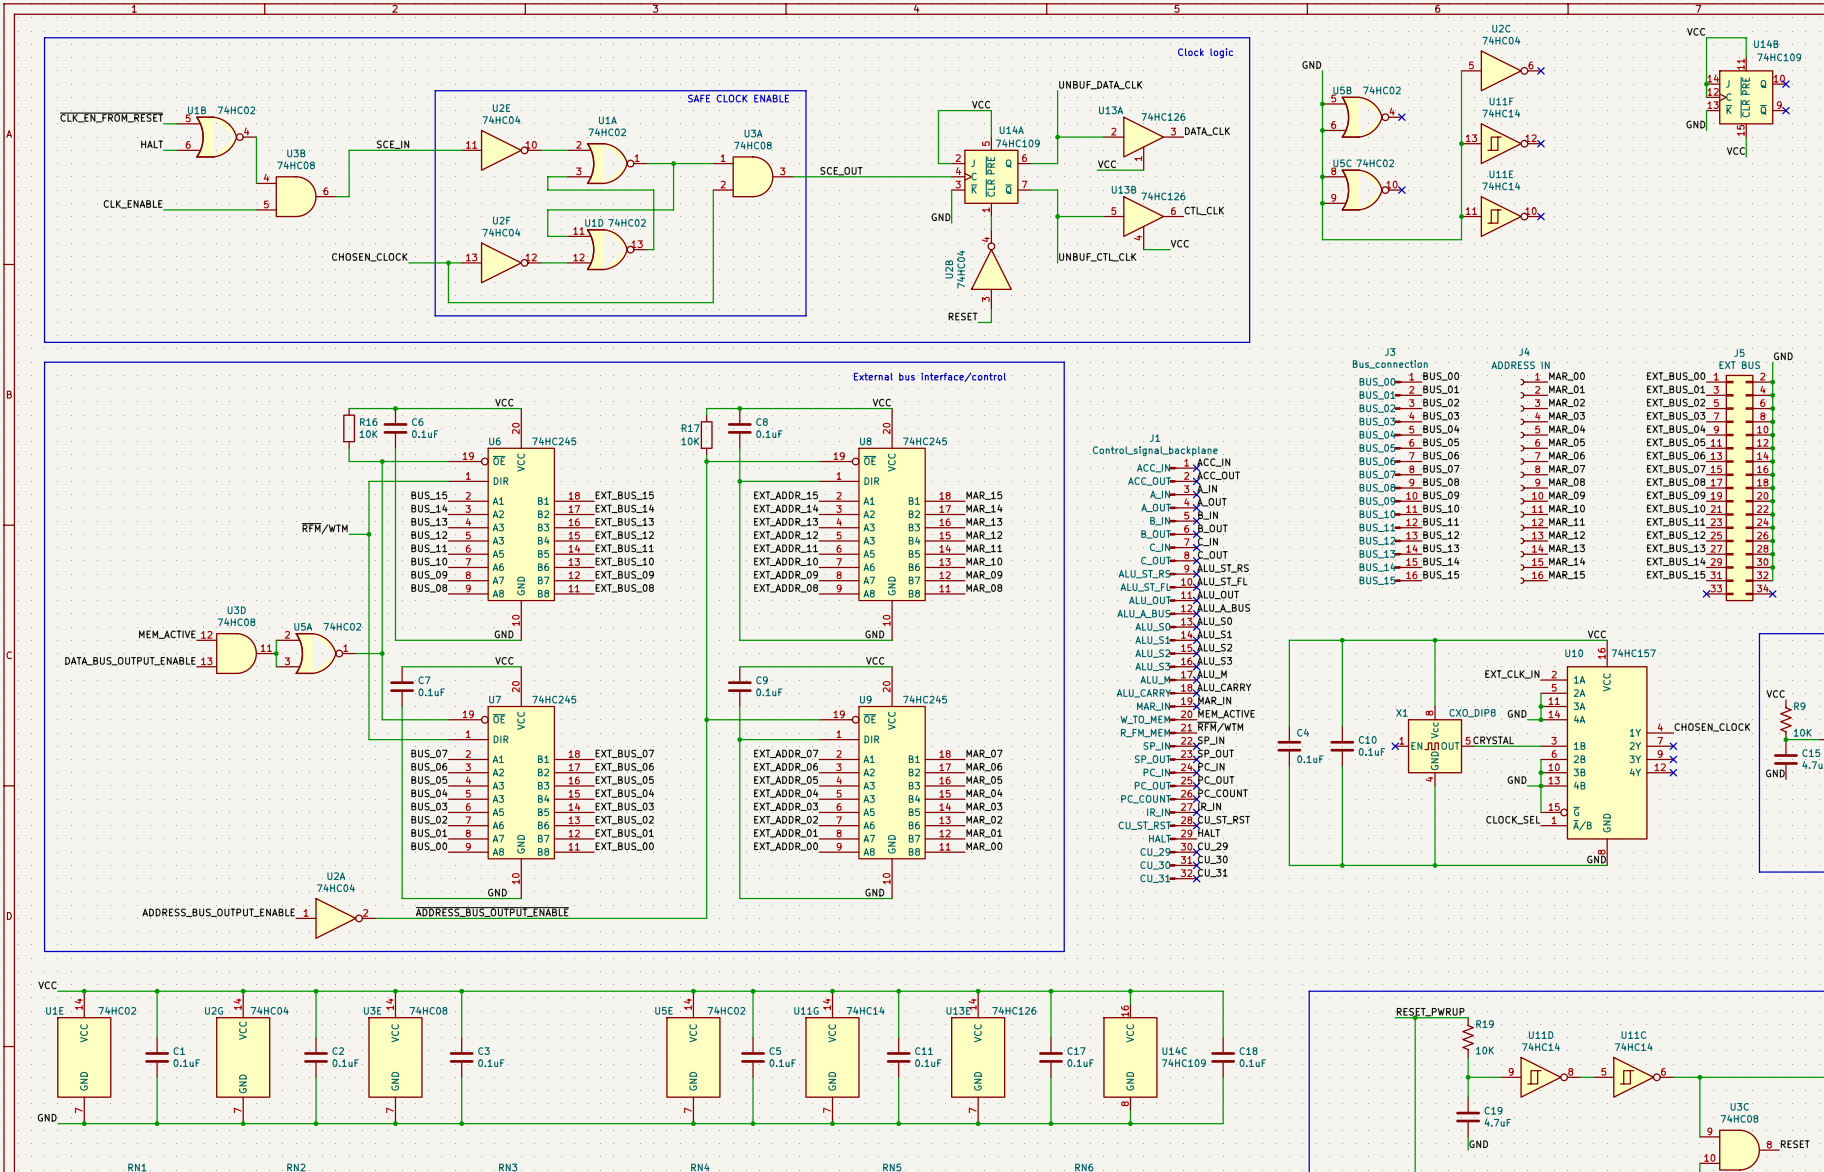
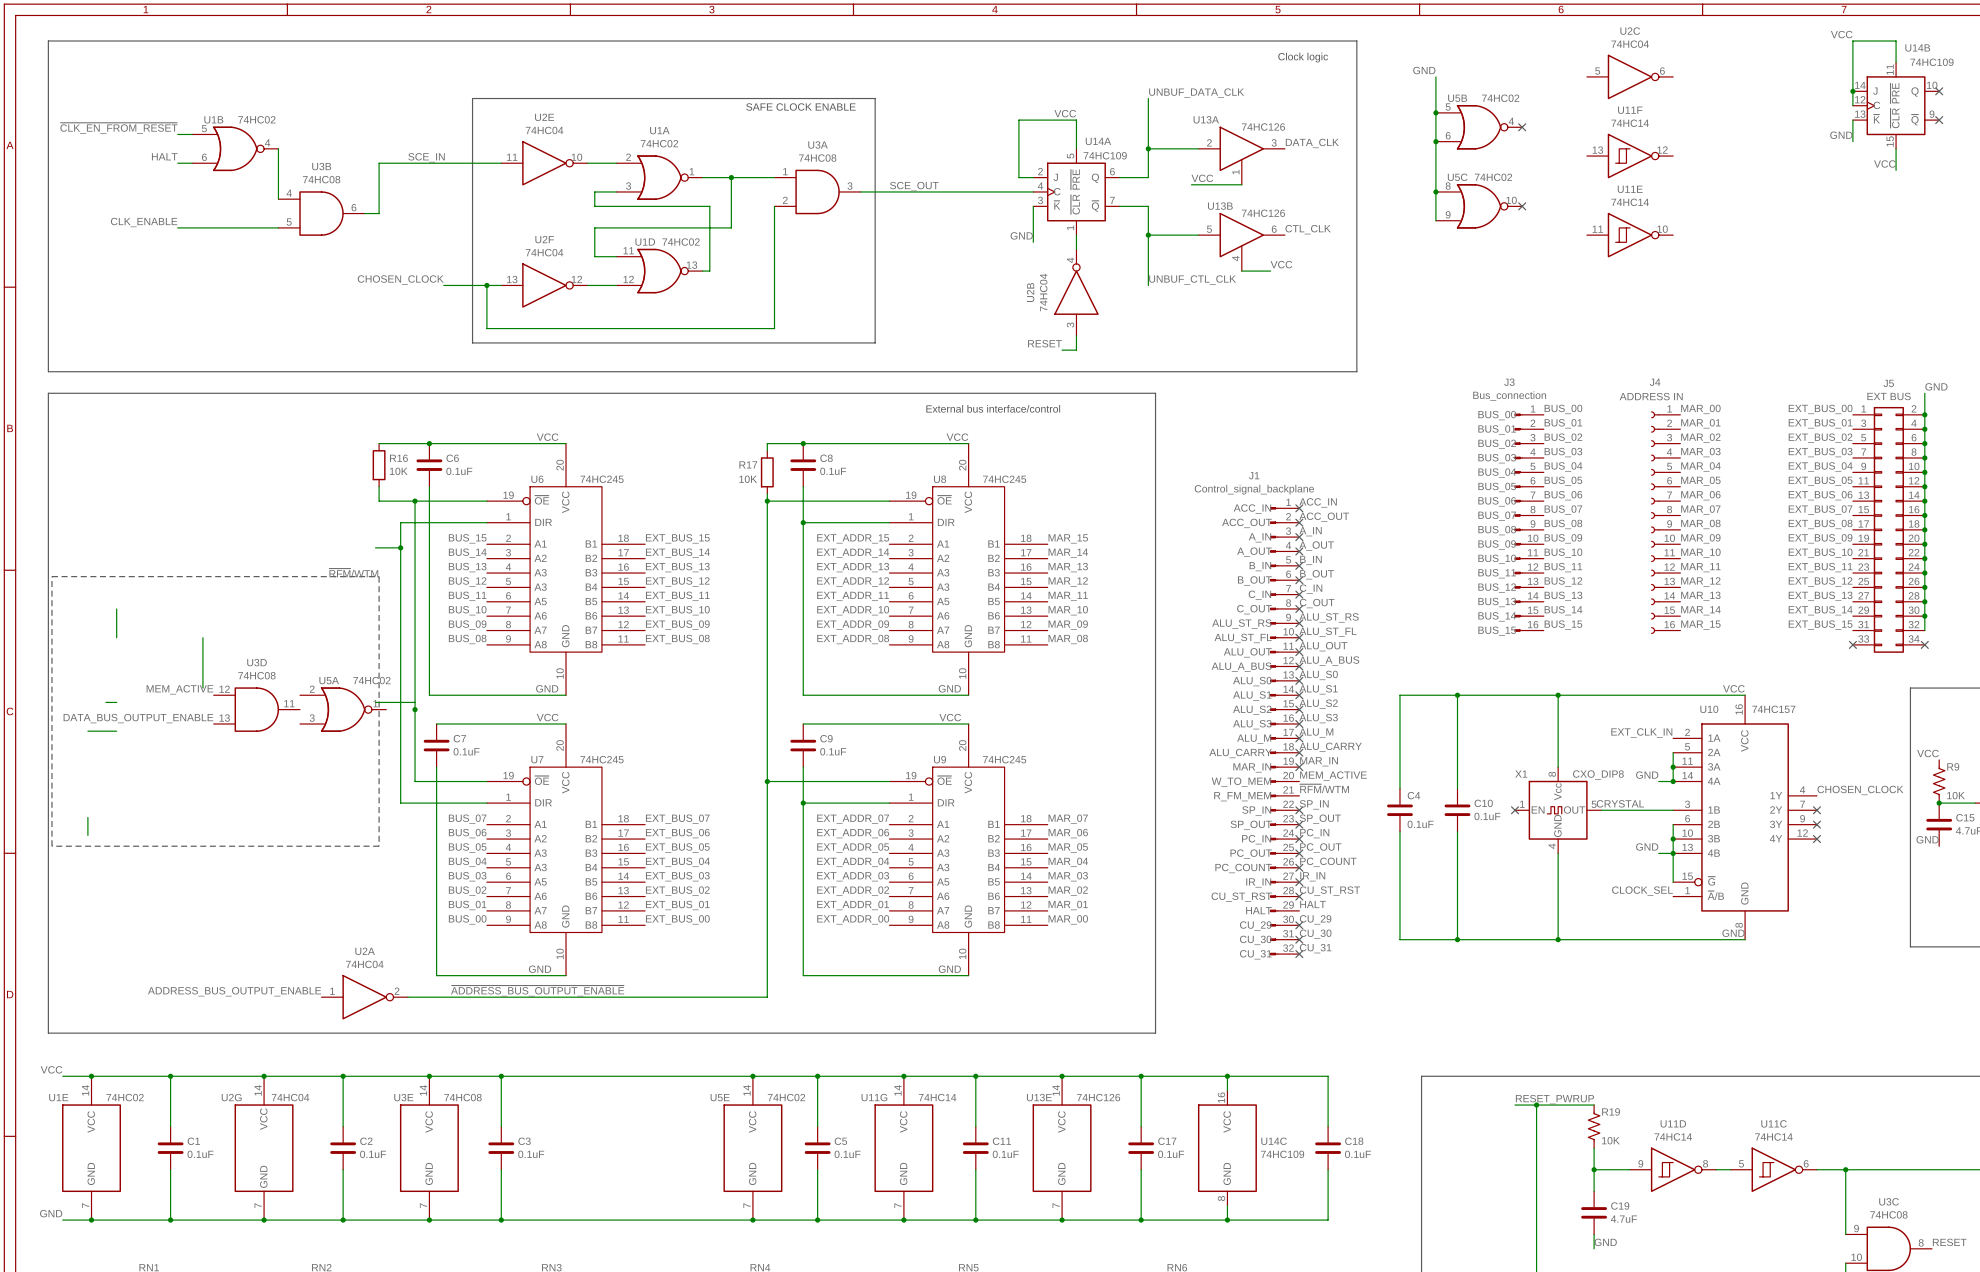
wire: (1461, 70) (1461, 239) (1322, 239) (1322, 203) -> none
no-connect mark: (1540, 70) -> none
junction: (1461, 143) -> none
no-connect mark: (1540, 143) -> none
junction: (1322, 203) -> none
junction: (1461, 216) -> none
no-connect mark: (1540, 216) -> none
wire: none -> (375, 547) (400, 547)
line: none -> (51, 576) (379, 576) (379, 846) (51, 846) (51, 576)
wire: (349, 534) (368, 534) -> none
junction position: (368, 534) -> (400, 547)
wire: none -> (116, 608) (116, 637)
wire: none -> (202, 637) (202, 688)
wire: (276, 640) (276, 666) -> none
wire: none -> (105, 702) (116, 702)
wire: none -> (375, 702) (415, 702)
junction: (276, 653) -> none
wire: (355, 653) (382, 653) -> none
wire: none -> (87, 731) (116, 731)
wire: none -> (87, 817) (87, 835)

